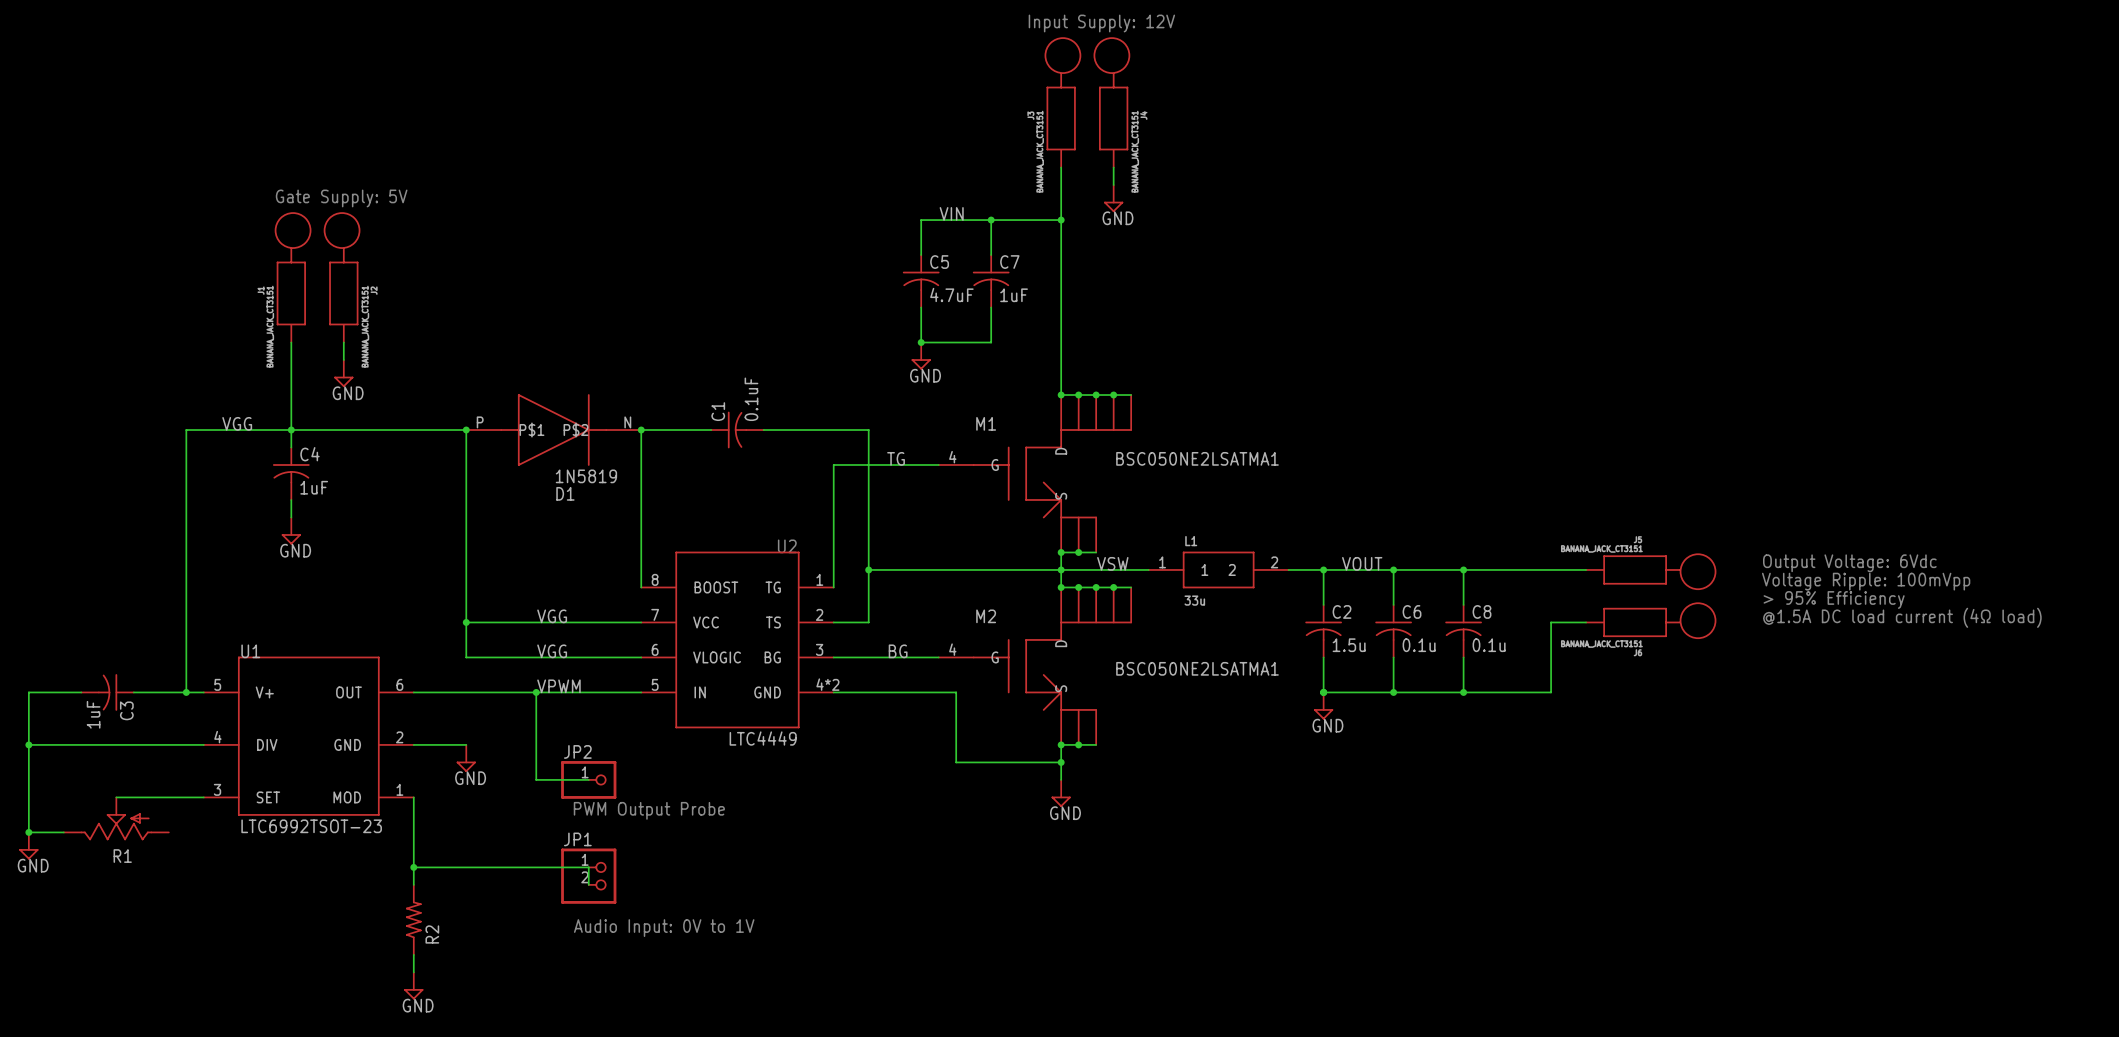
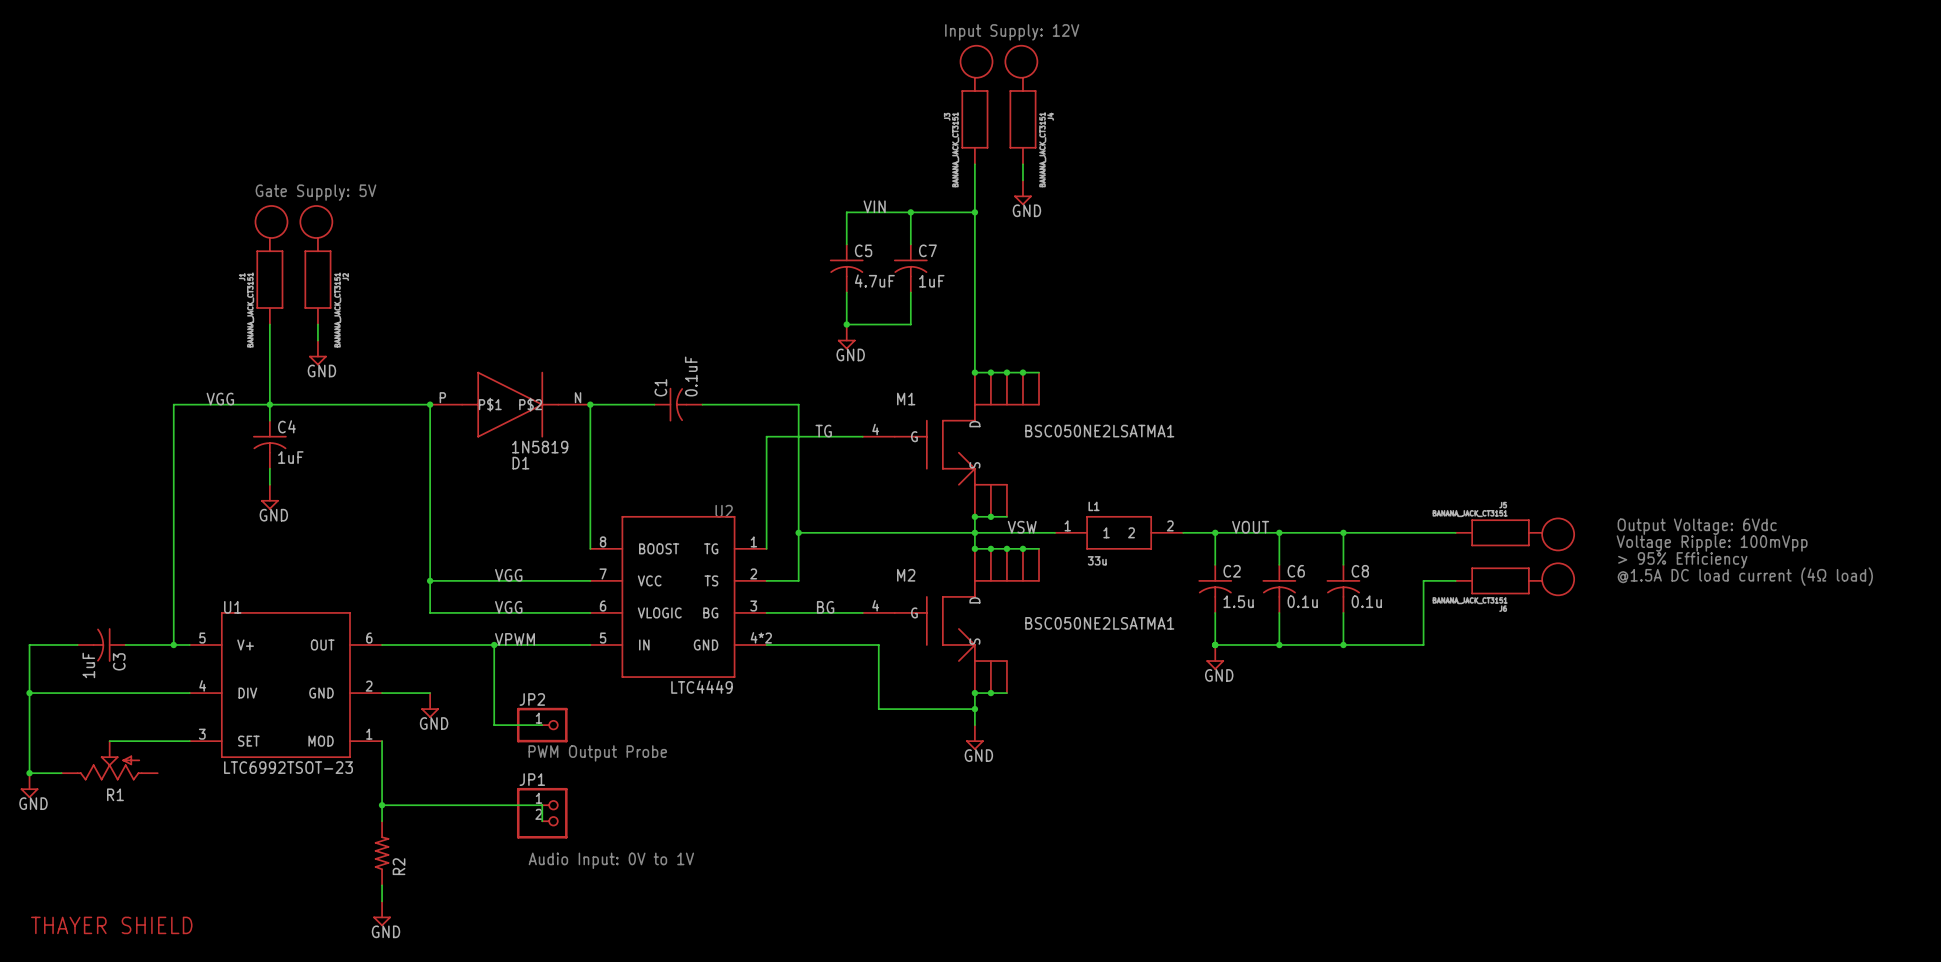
part: none -> (111, 925)

